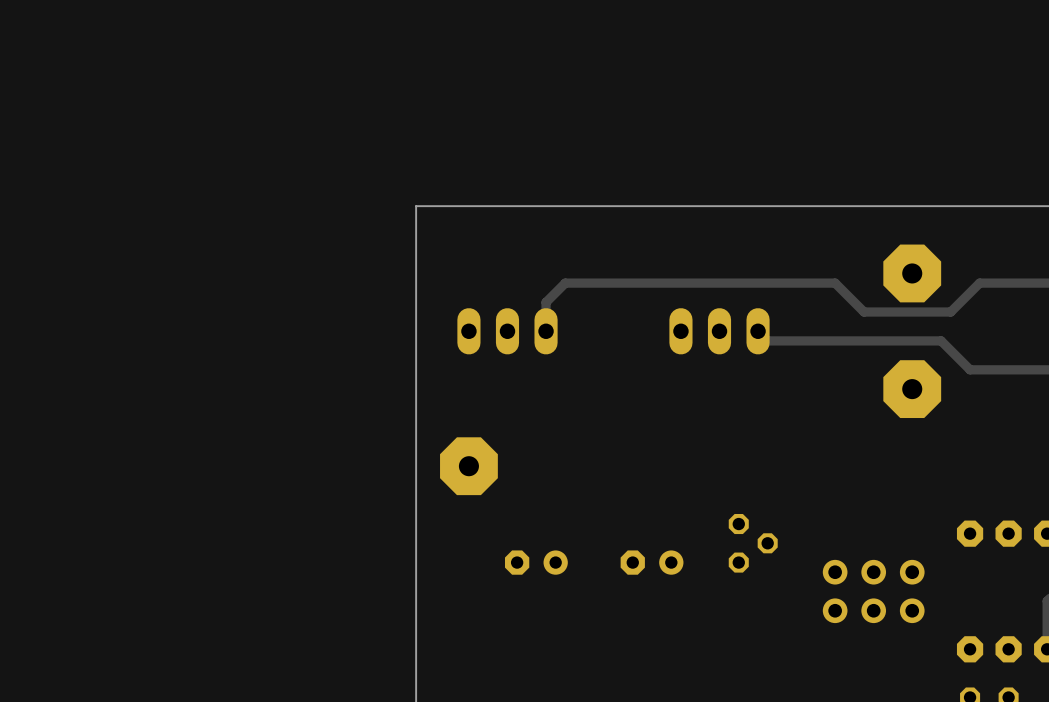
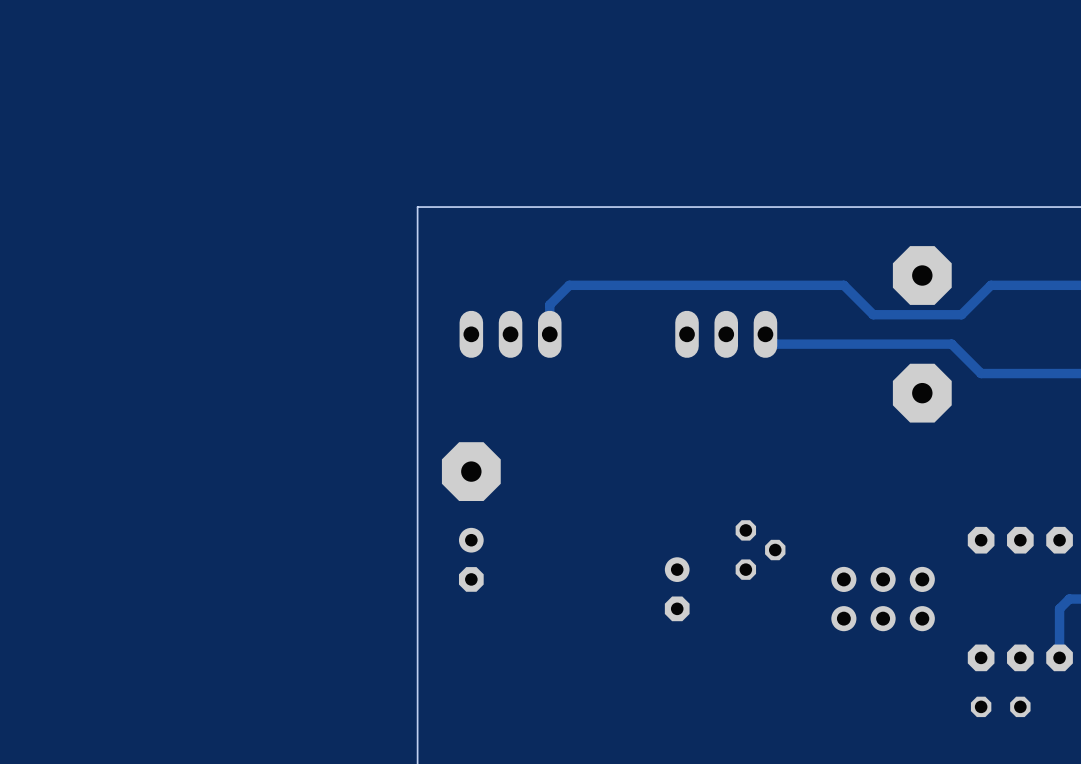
part: none -> (471, 559)
part: (536, 562) -> none
part rotation: 0° (652, 562) -> 90° counterclockwise (677, 589)

